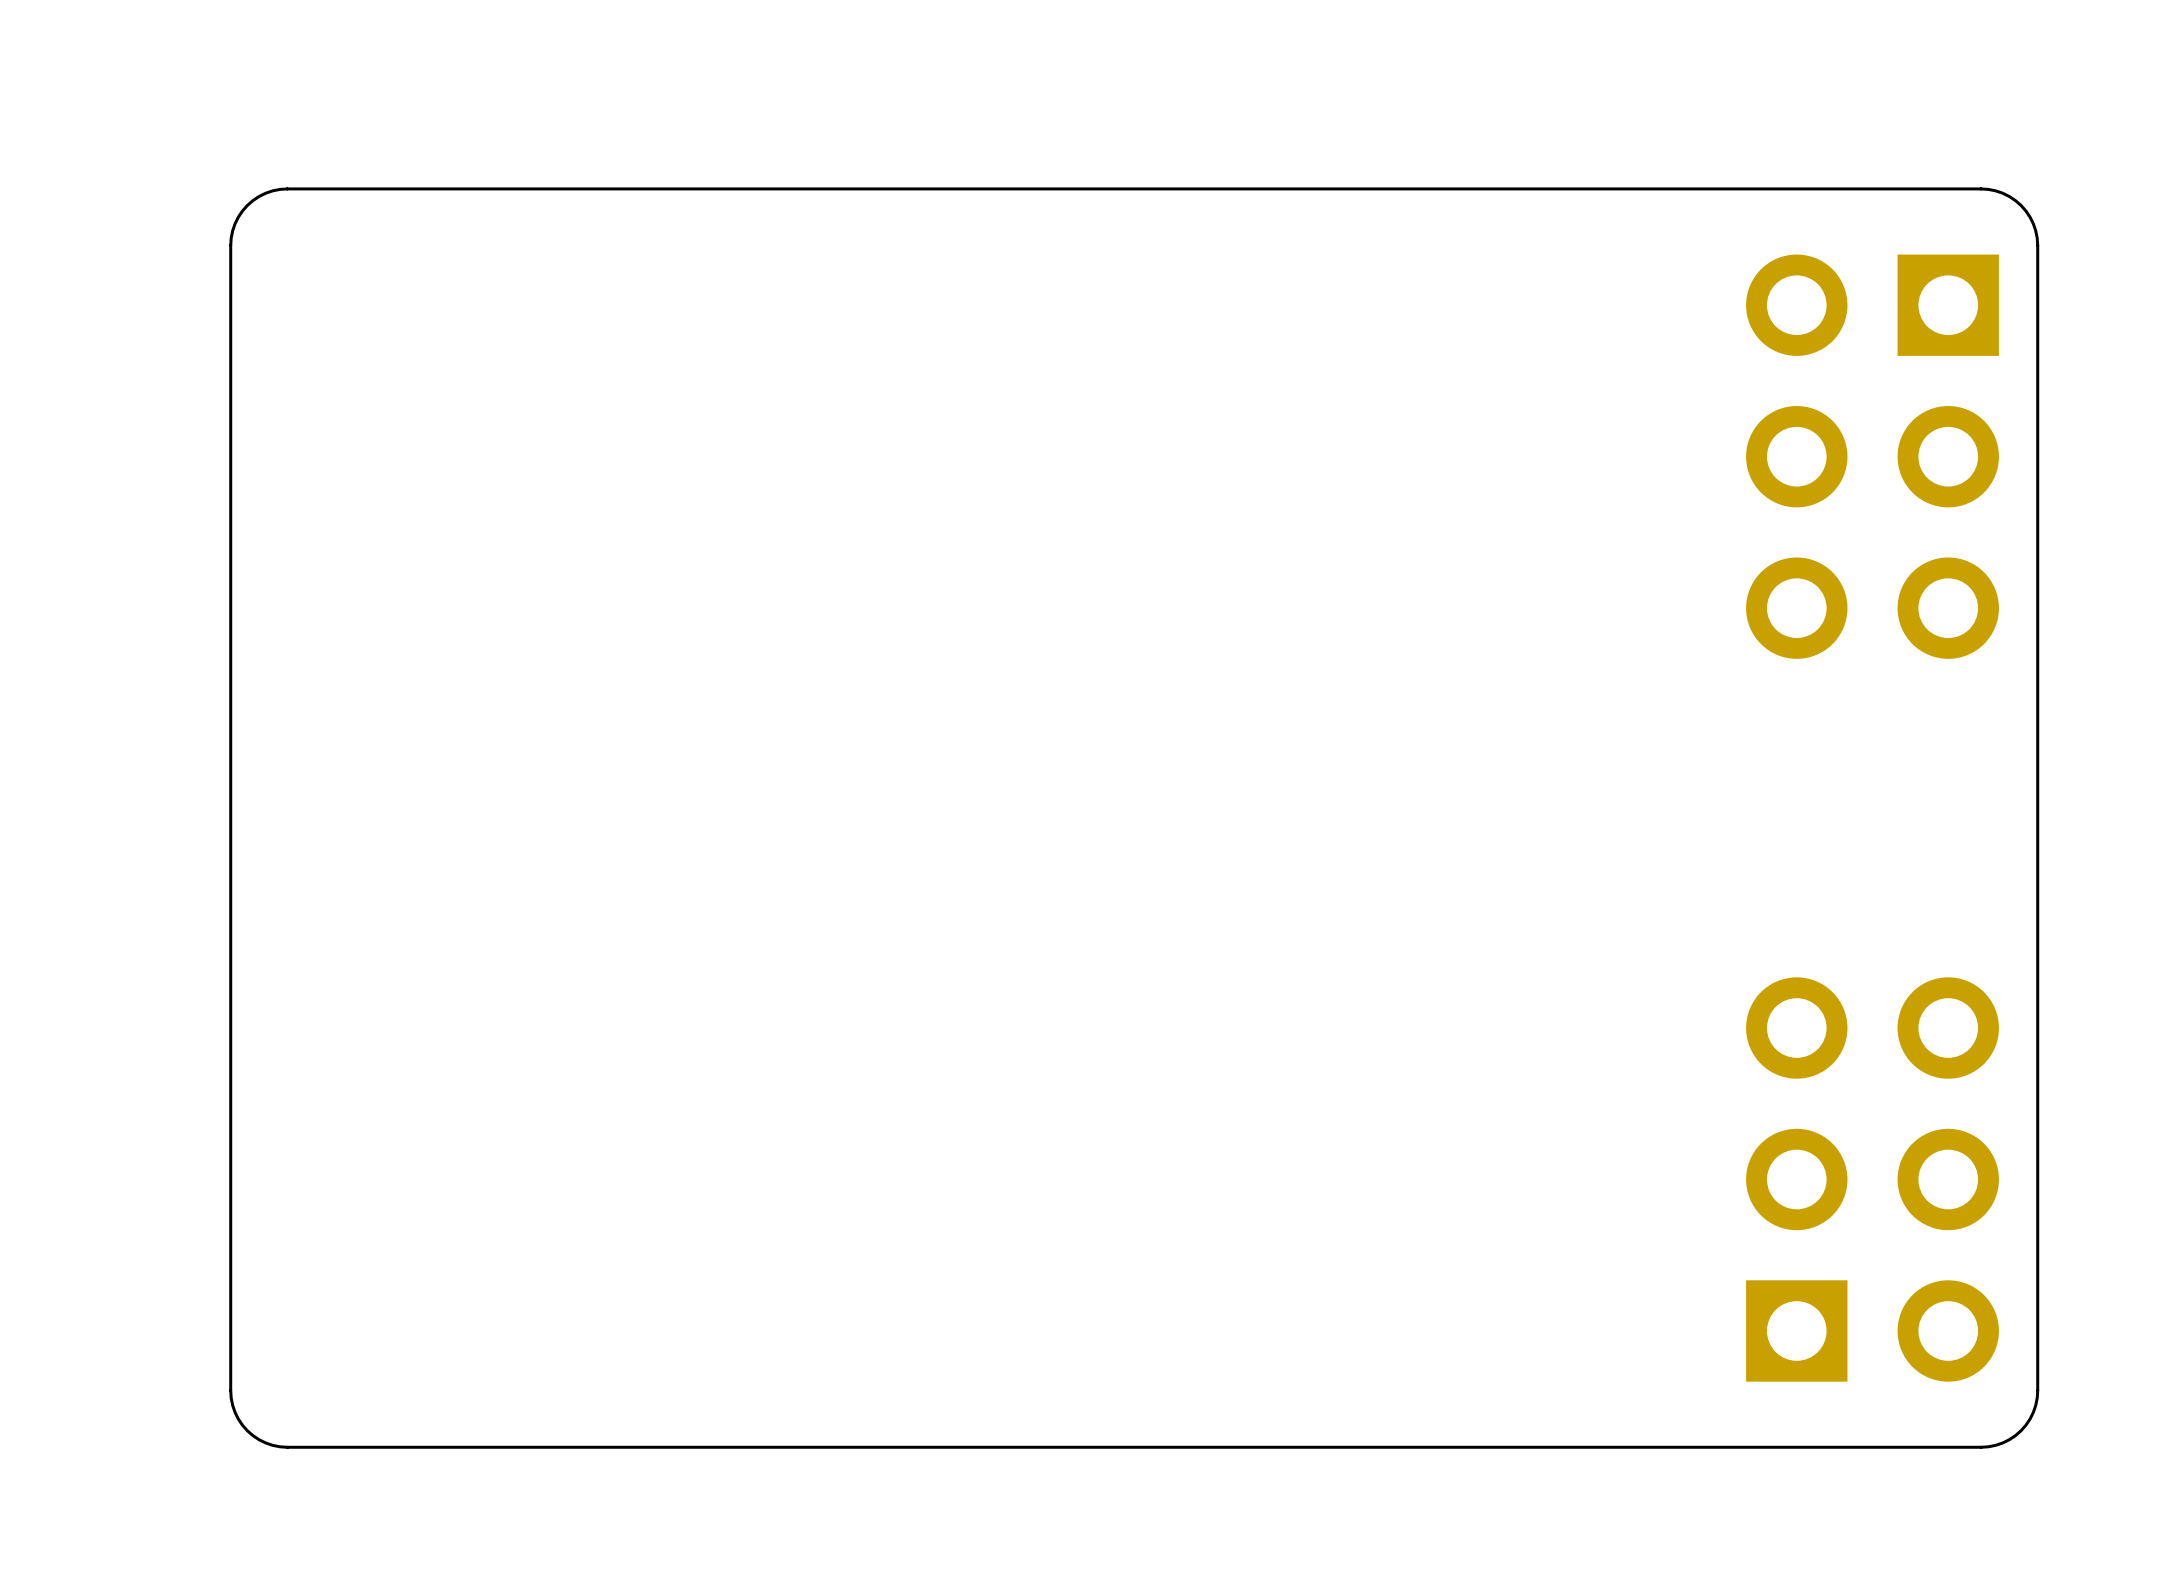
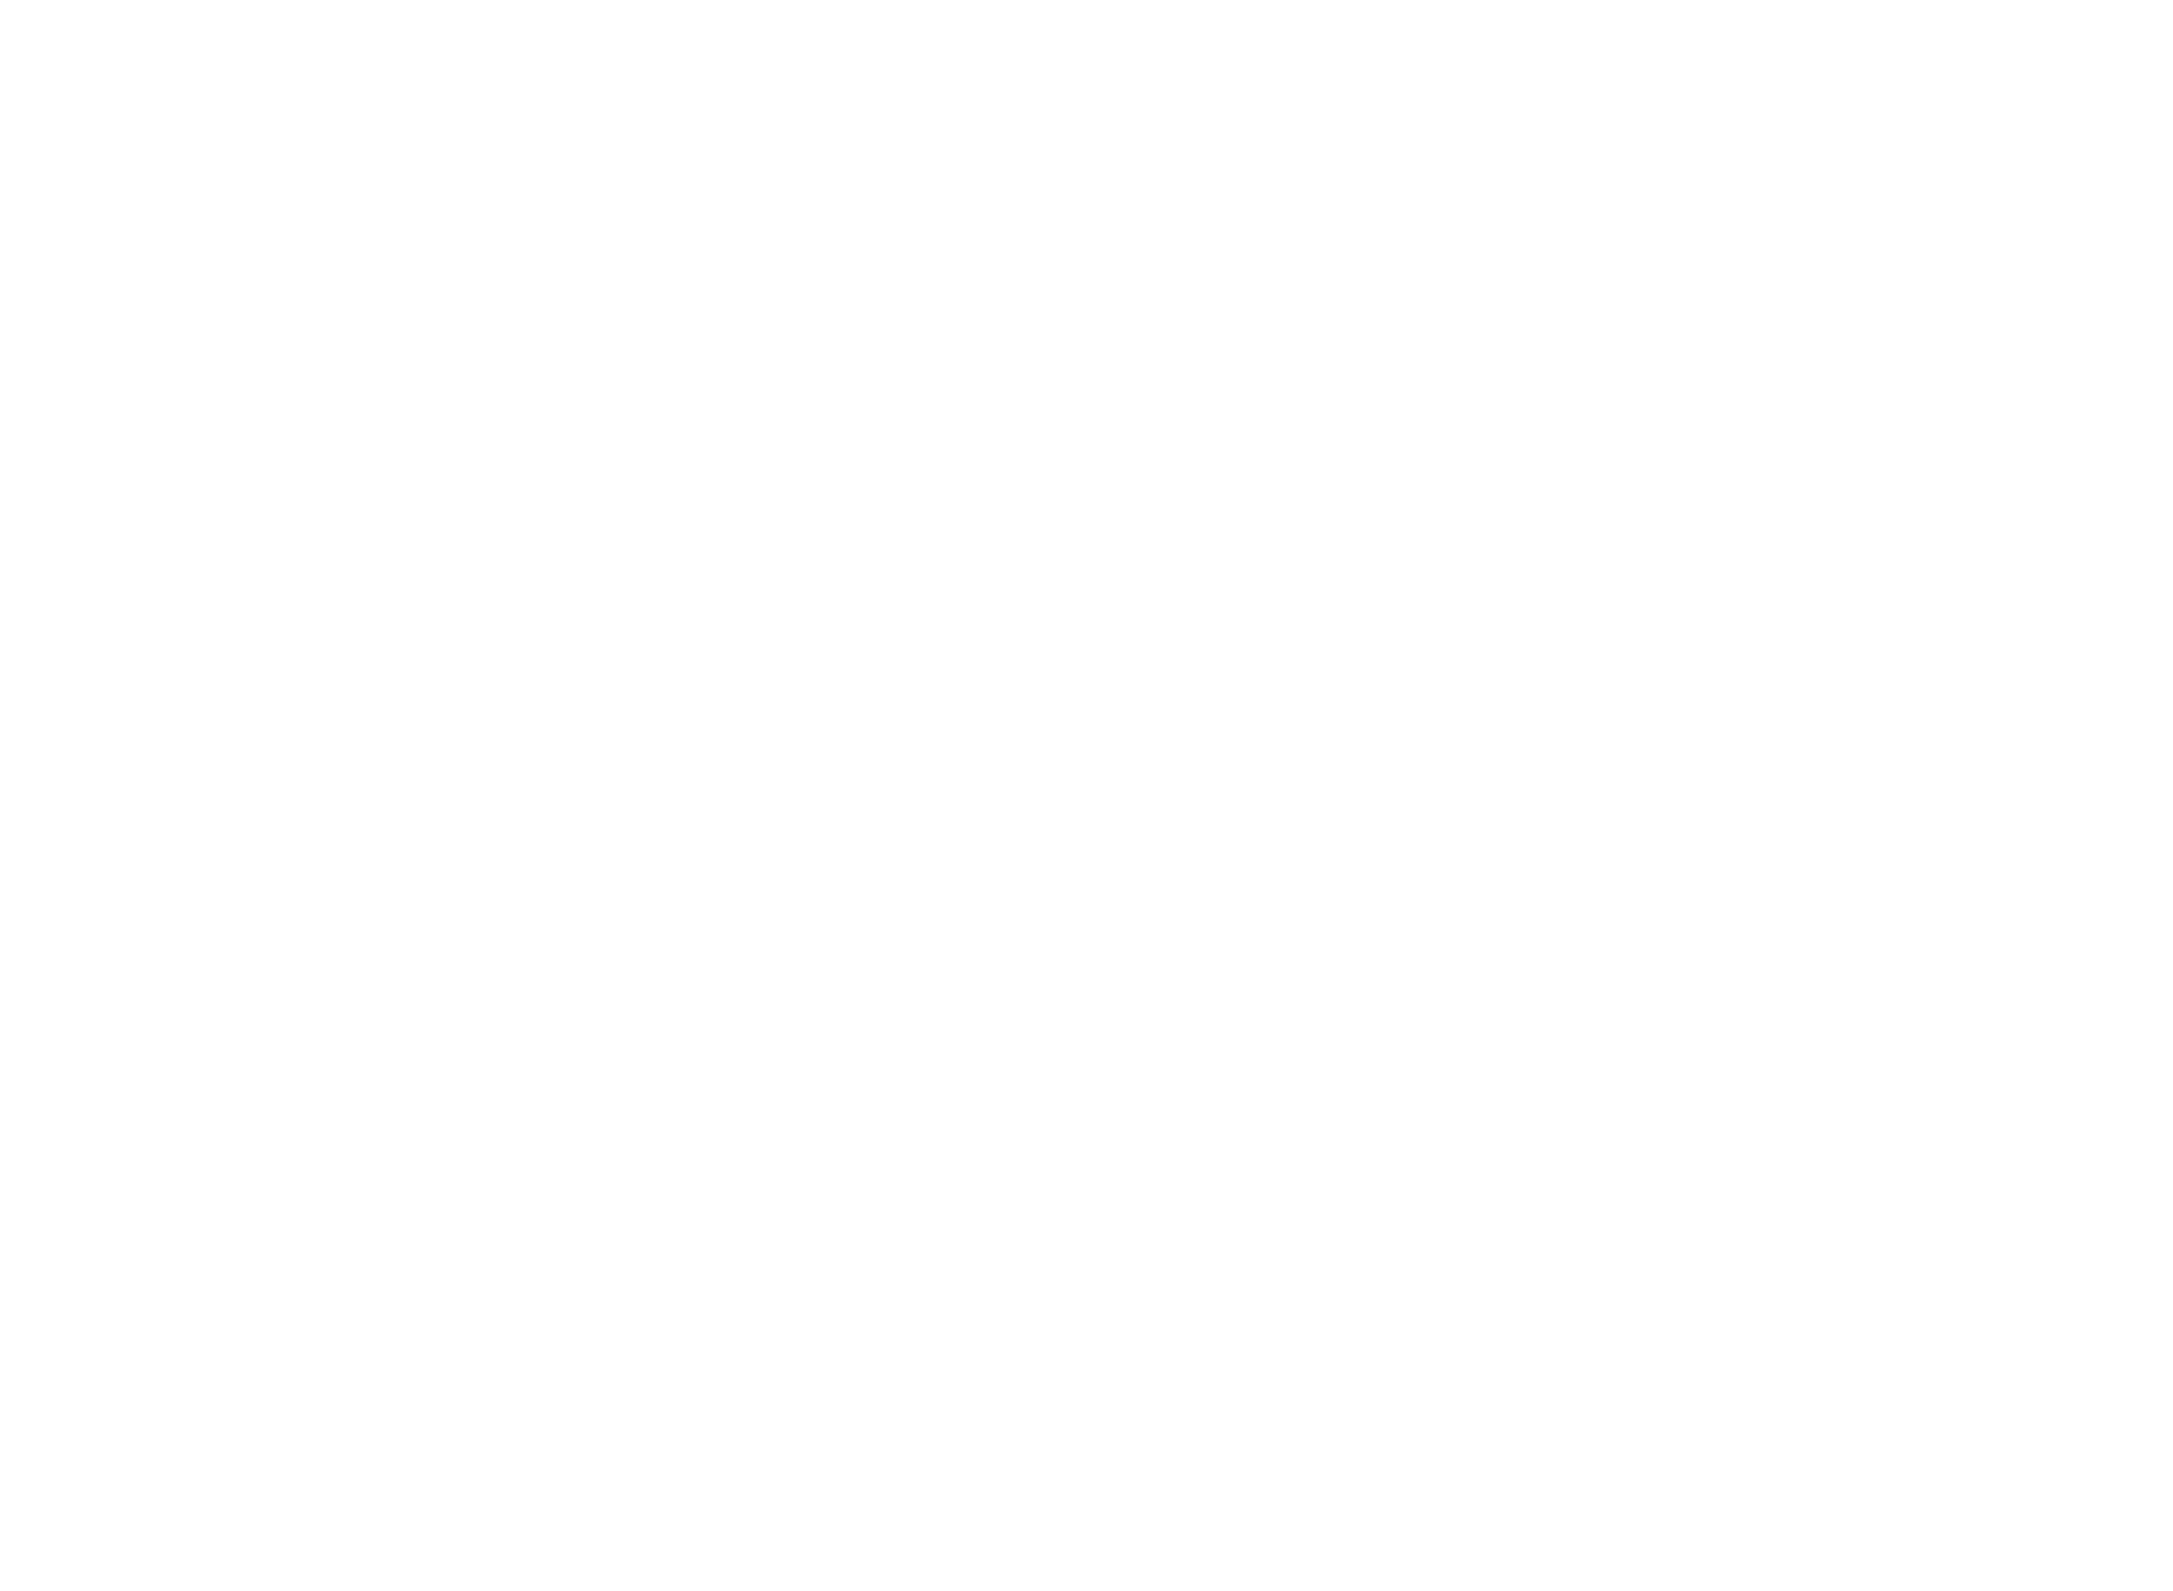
board edge: (1981, 188) (287, 188) (272, 190) (252, 200) (242, 211) (235, 223) (230, 245) (230, 1390) (232, 1405) (242, 1425) (252, 1435) (265, 1442) (287, 1447) (1981, 1447) (1995, 1445) (2015, 1435) (2030, 1418) (2035, 1405) (2037, 1390) (2037, 245) (2033, 223) (2021, 205) (2002, 193) (1981, 188) -> none
part: (1872, 456) -> none
part: (1872, 1179) -> none

